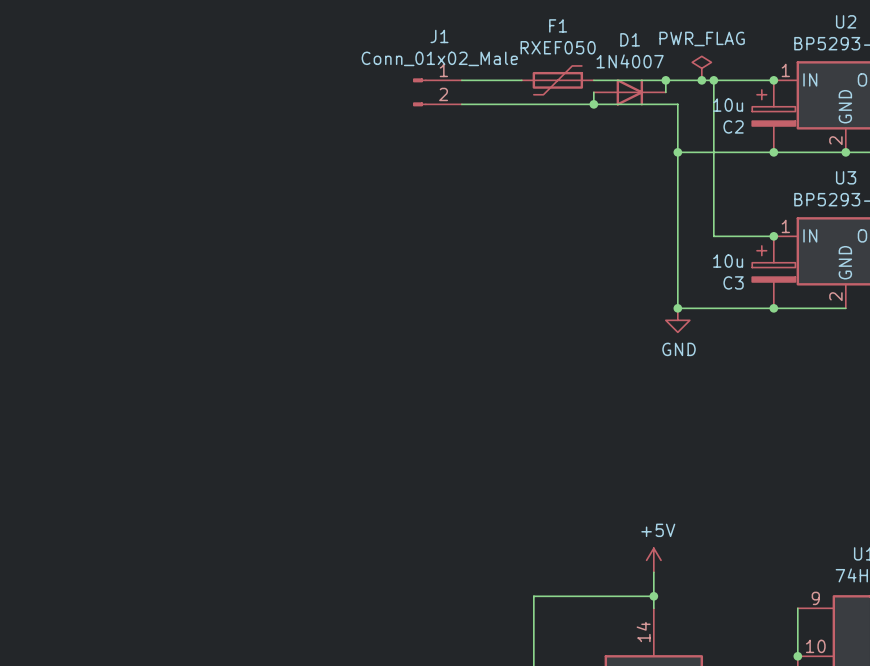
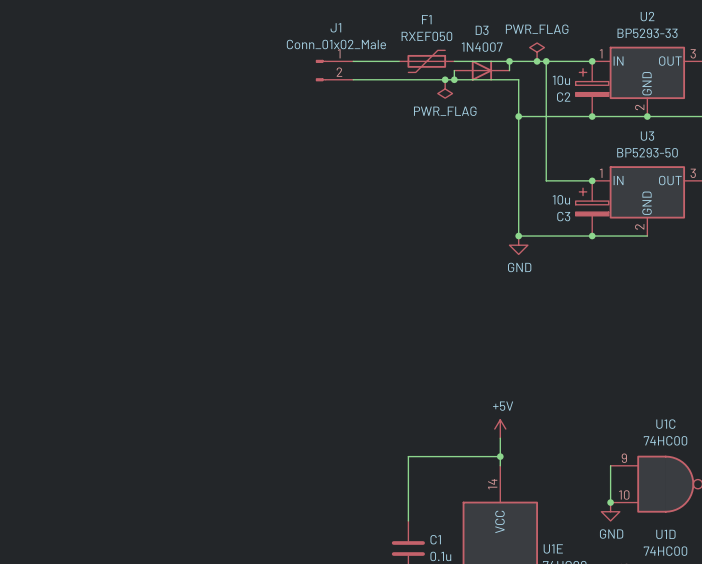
D1 name: D1 (630, 39) -> D3 (482, 30)
junction: none -> (445, 79)
power symbol: none -> PWR_FLAG (445, 88)

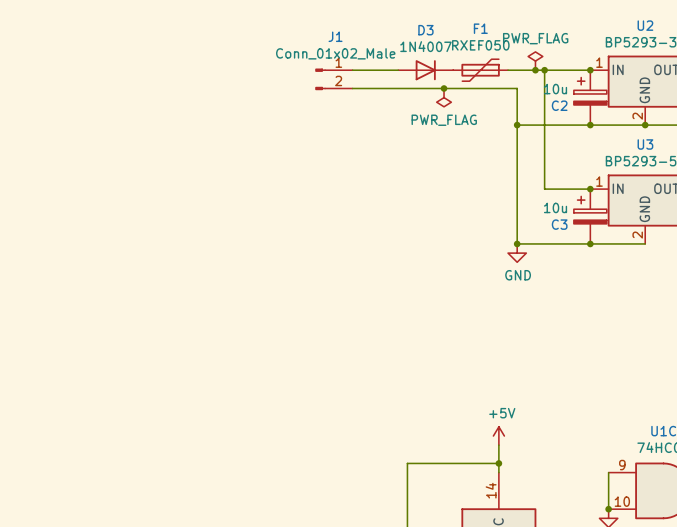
F1 position: (426, 61) -> (480, 70)
junction: (509, 61) -> none
wire: (454, 70) (454, 79) -> none
D3 position: (481, 70) -> (425, 70)
junction: (454, 79) -> none

